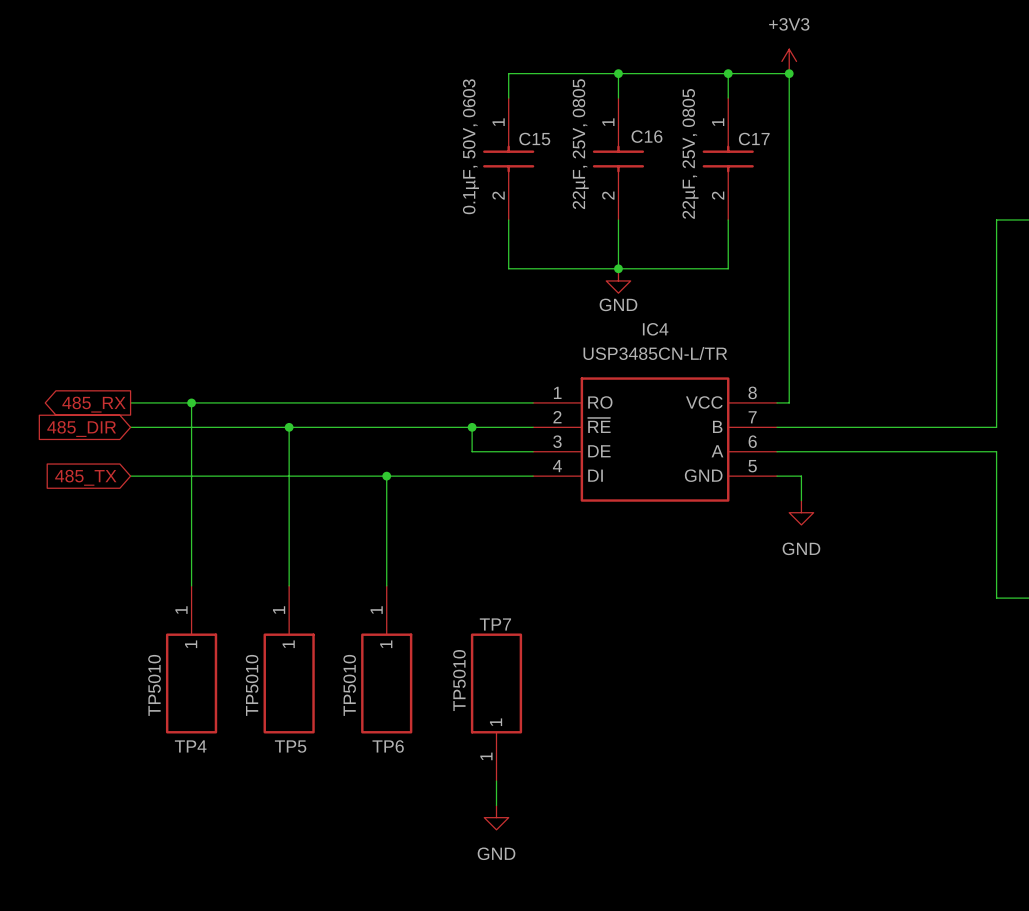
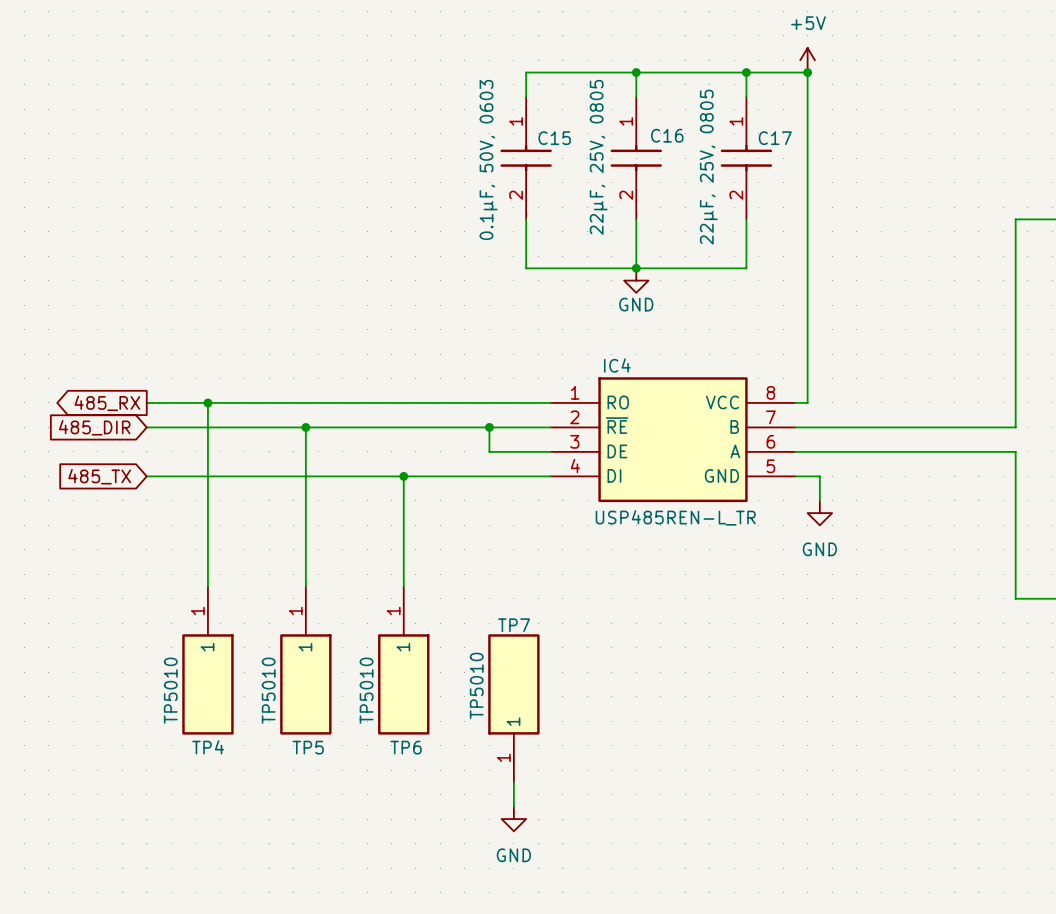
power symbol: +3V3 (789, 61) -> +5V (807, 60)
IC4 name position: IC4 (655, 329) -> IC4 (617, 365)
IC4 value: USP3485CN-L/TR (655, 353) -> USP485REN-L_TR (675, 517)

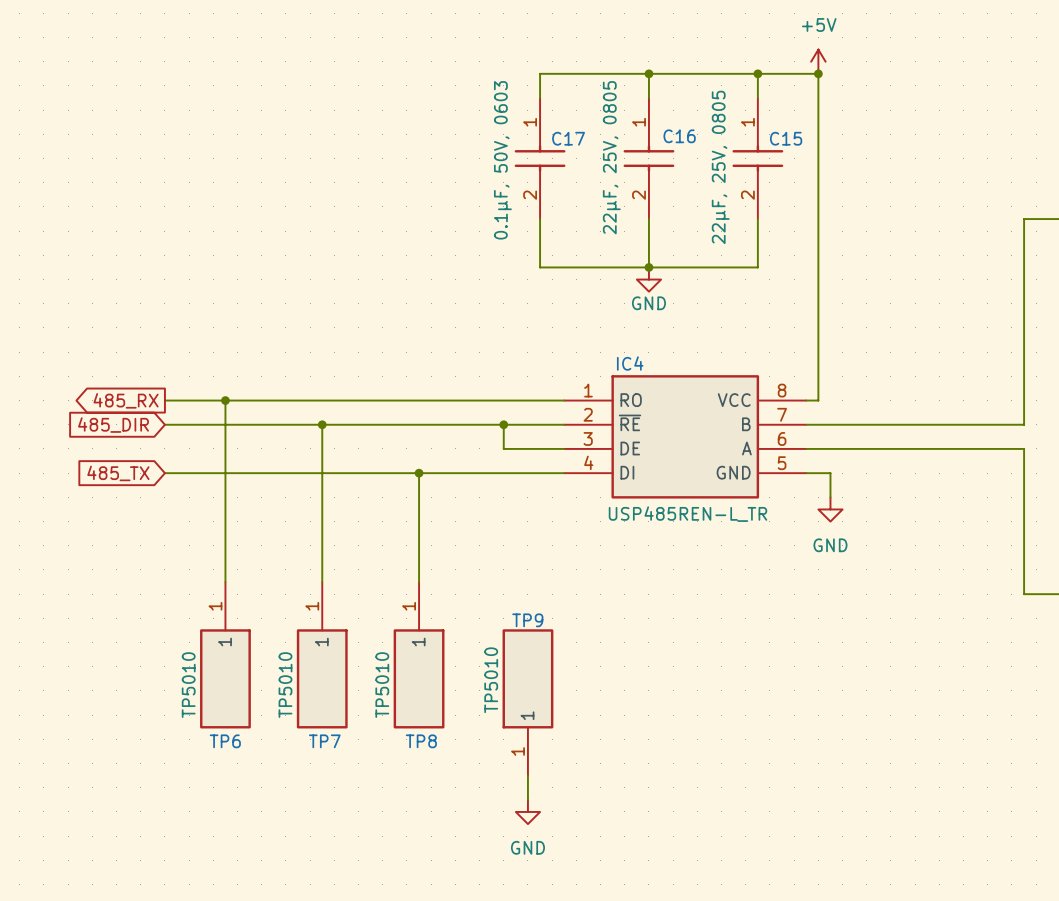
C15 name: C15 (554, 138) -> C17 (568, 138)
C17 name: C17 (775, 138) -> C15 (786, 138)
TP7 name: TP7 (514, 625) -> TP9 (527, 620)
TP4 name: TP4 (208, 747) -> TP6 (225, 741)
TP5 name: TP5 (308, 747) -> TP7 (324, 741)
TP6 name: TP6 (406, 747) -> TP8 (421, 741)

